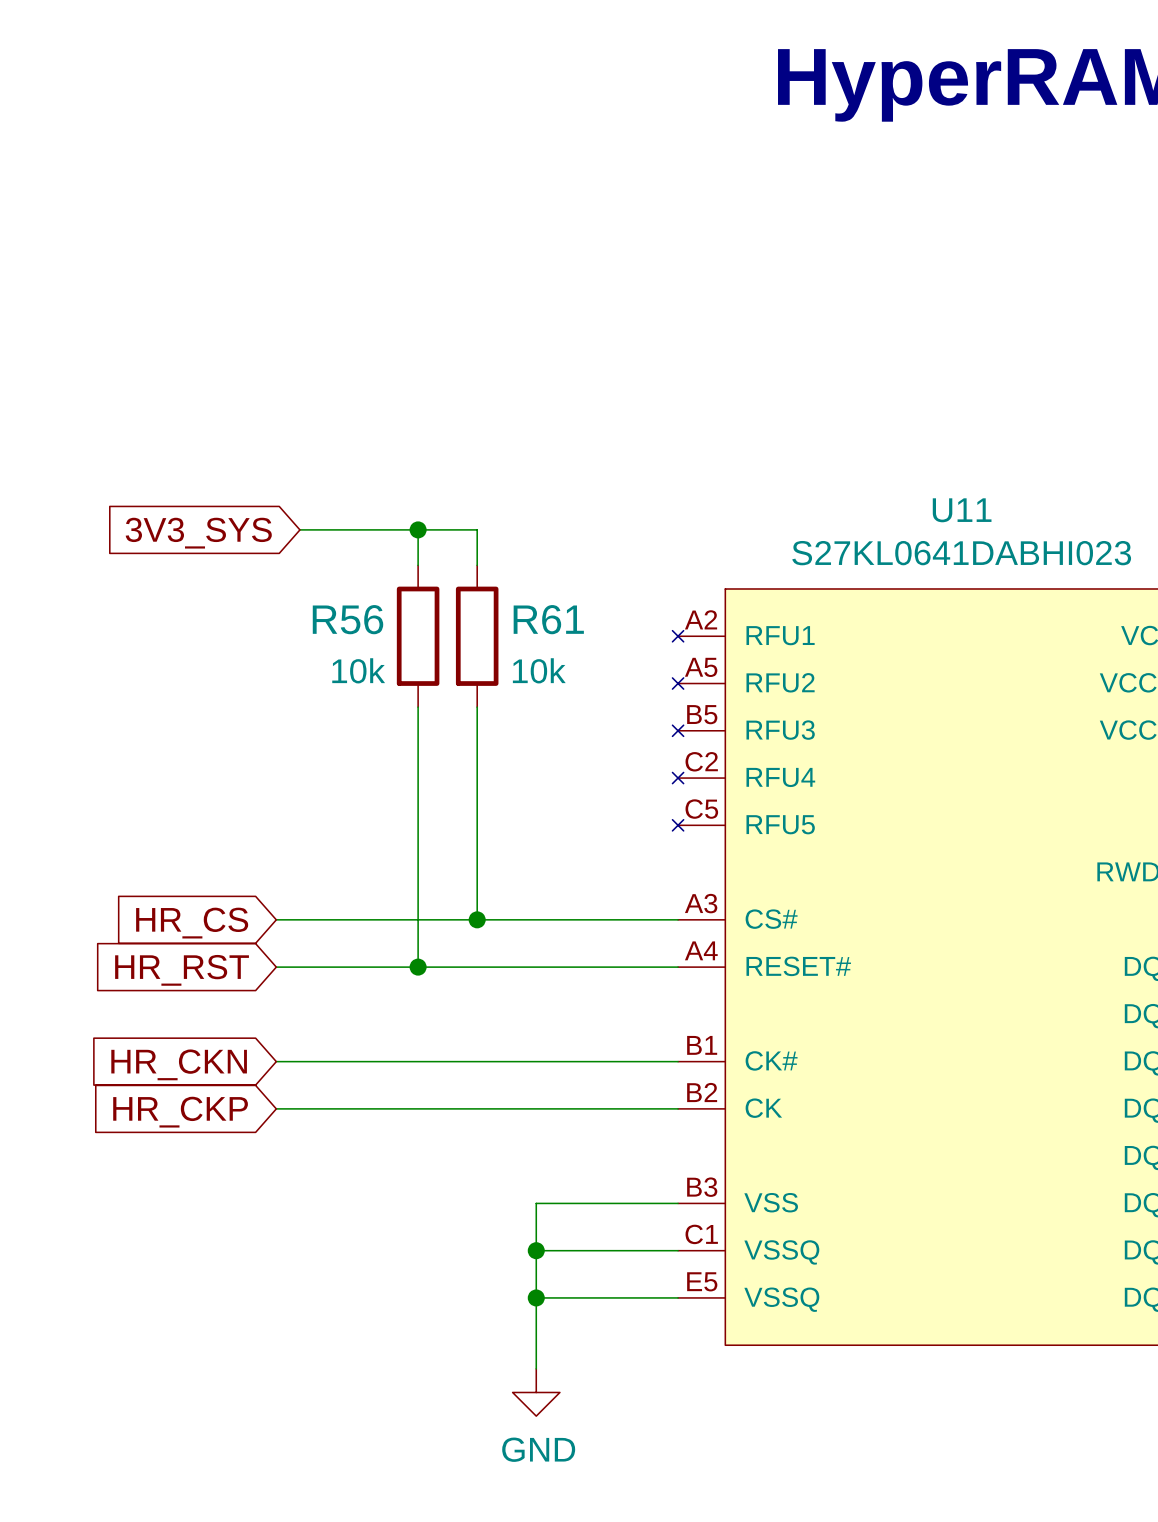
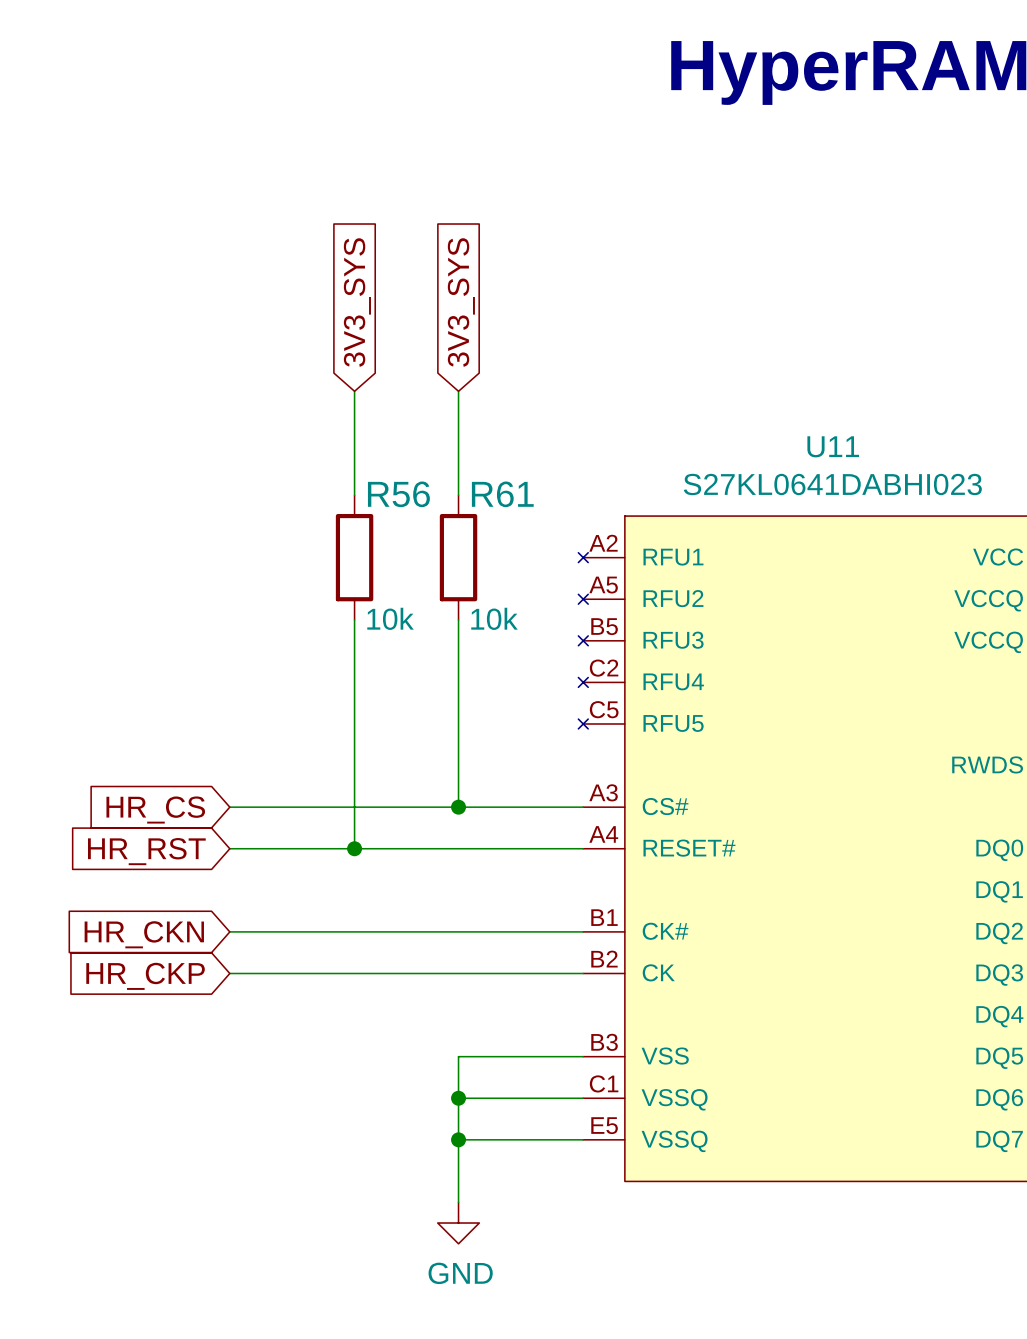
global label: none -> 3V3_SYS (357, 302)
global label: none -> 3V3_SYS (461, 302)
wire: none -> (354, 391) (354, 464)
wire: none -> (458, 391) (458, 495)
wire: (299, 529) (477, 529) (477, 565) -> none
junction: (418, 529) -> none
global label: 3V3_SYS (198, 533) -> none
R56 name position: R56 (348, 619) -> R56 (398, 494)
R61 name position: R61 (548, 619) -> R61 (502, 494)
R61 position: (477, 636) -> (458, 557)
R56 text position: 10k (358, 670) -> 10k (390, 618)
R61 text position: 10k (539, 670) -> 10k (494, 618)
wire: (477, 707) (477, 919) -> (458, 620) (458, 807)
junction position: (477, 919) -> (458, 807)

